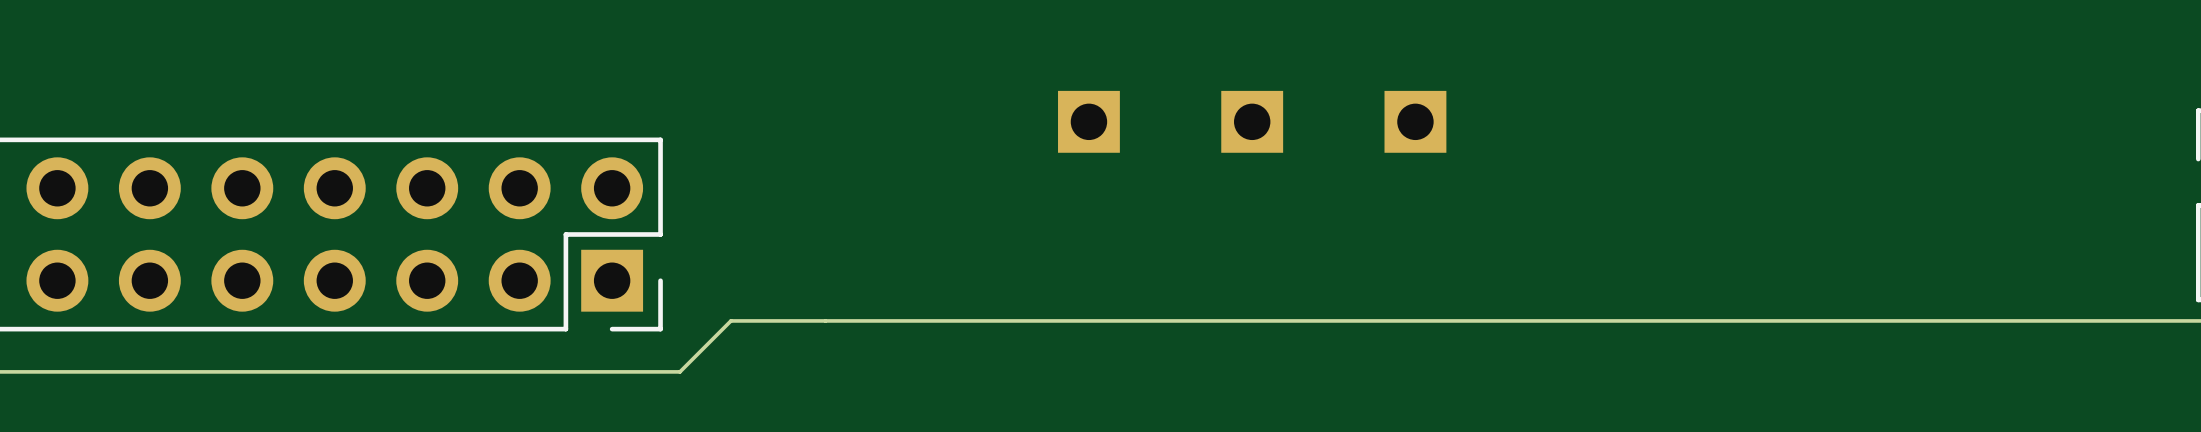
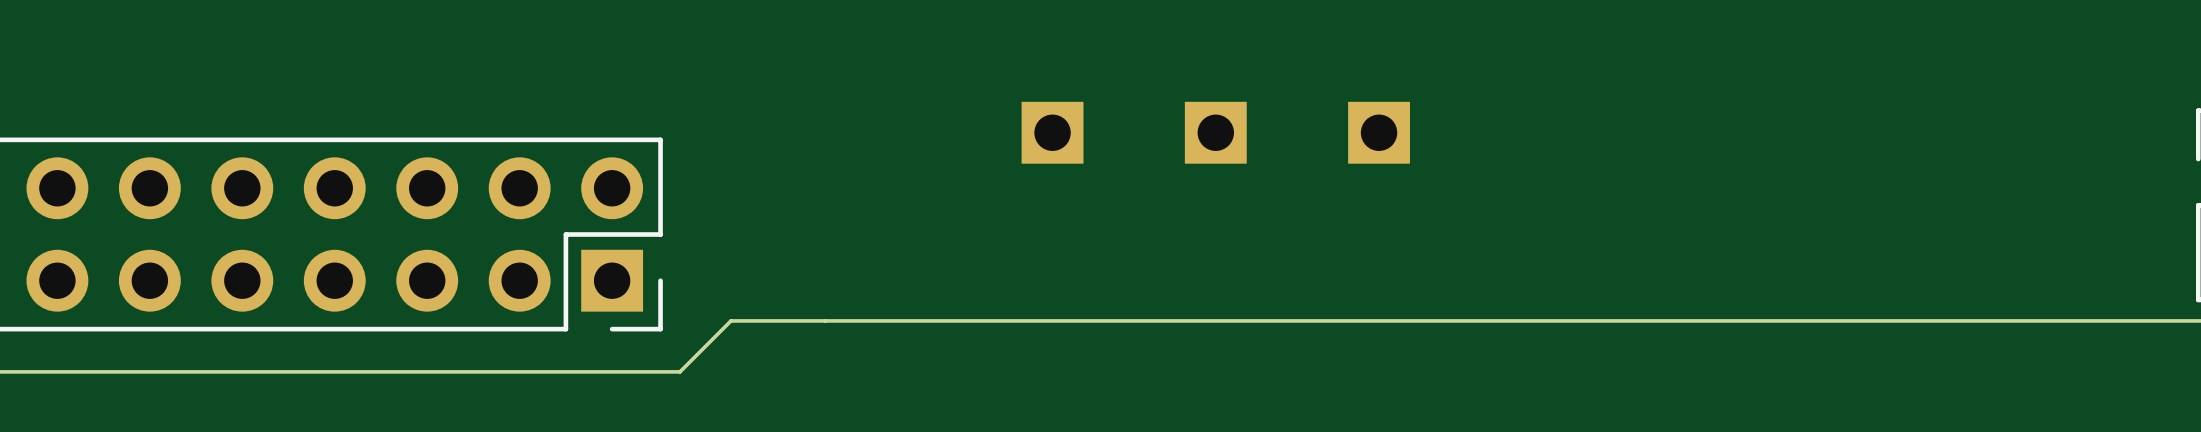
part position: (1088, 121) -> (1052, 132)
part position: (1252, 121) -> (1215, 132)
part position: (1415, 121) -> (1379, 132)

